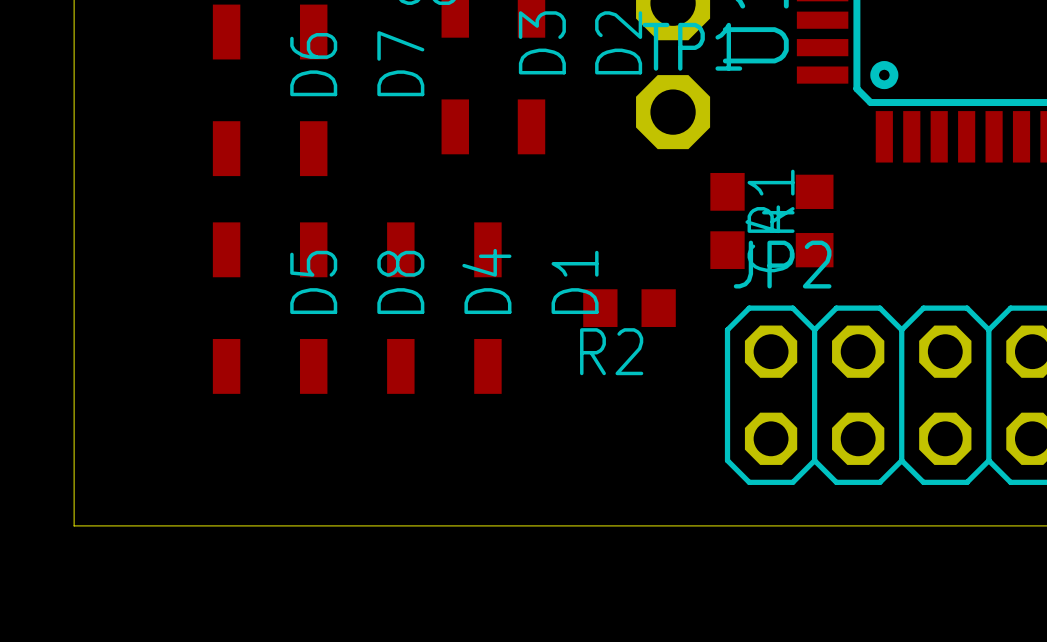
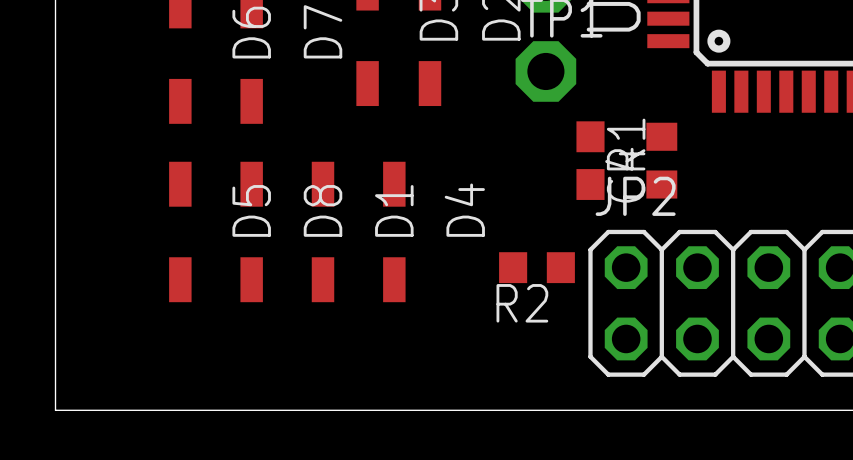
D4 name: D4 (486, 281) -> D1 (394, 210)
D1 name: D1 (575, 282) -> D4 (464, 210)
R2 position: (629, 308) -> (536, 267)

